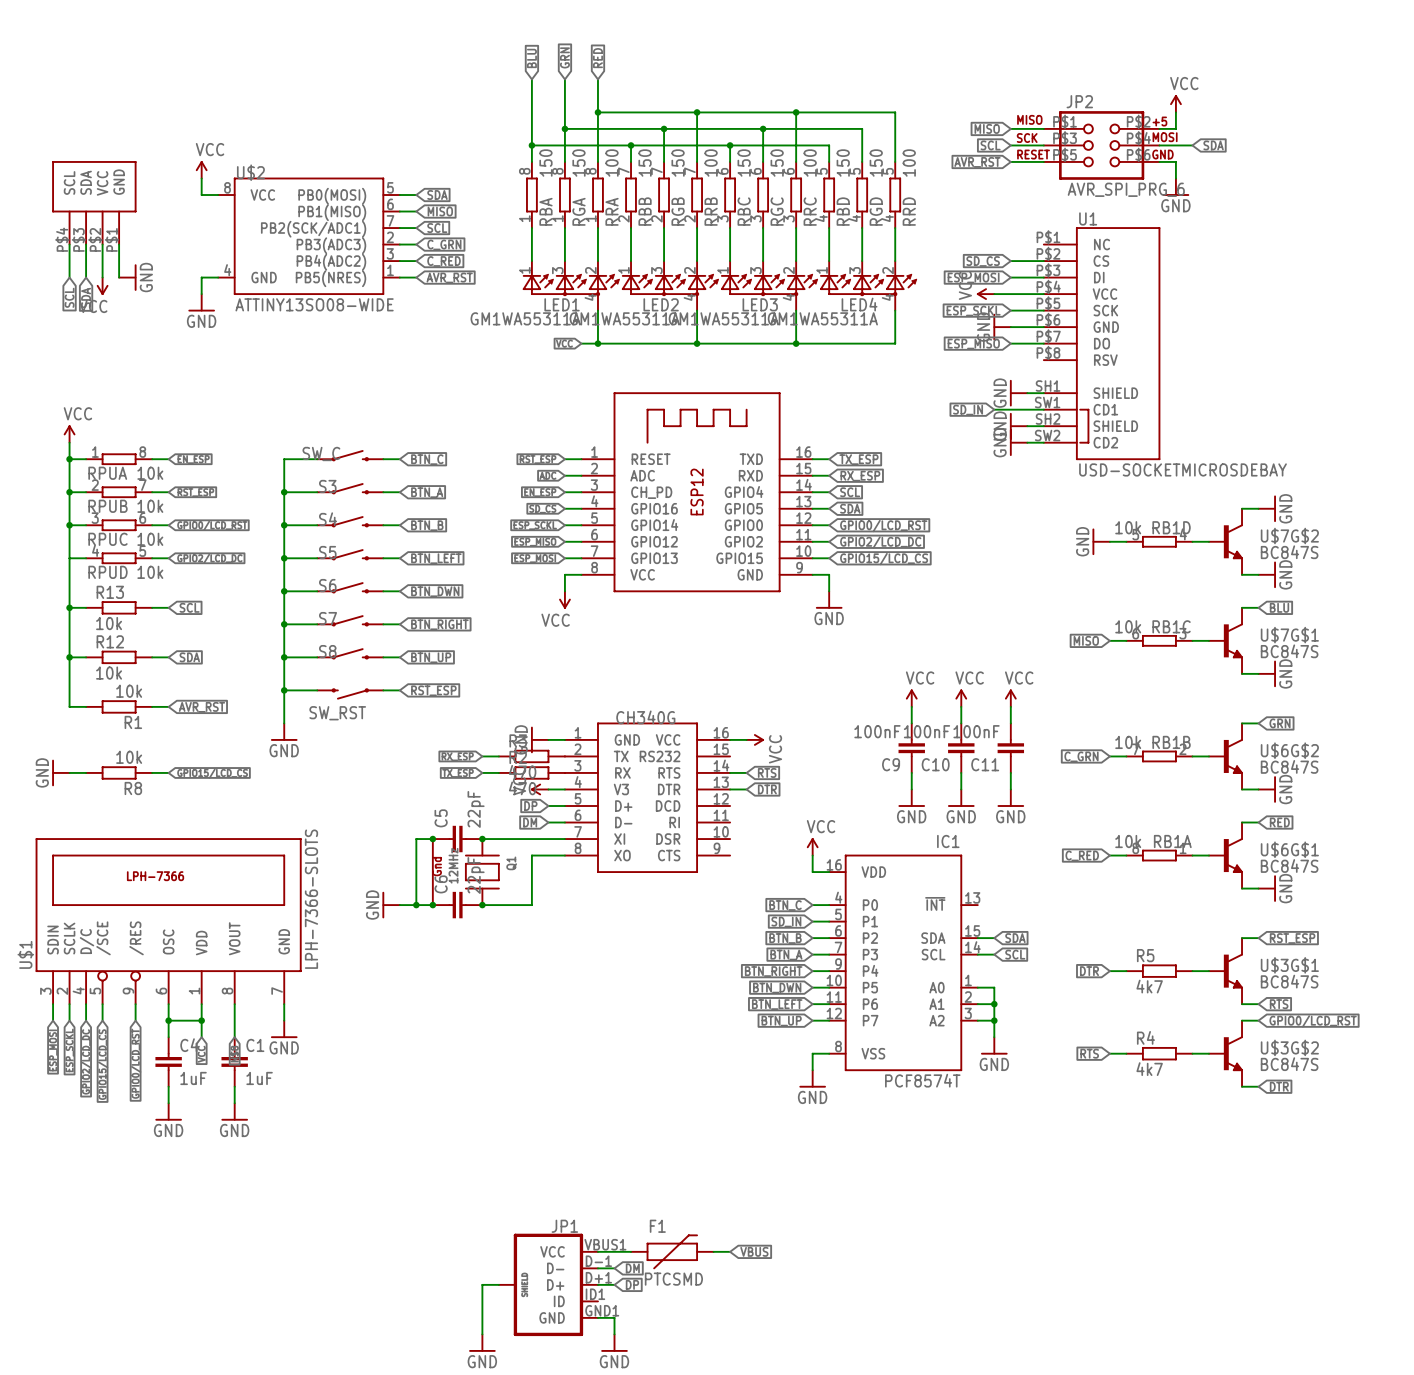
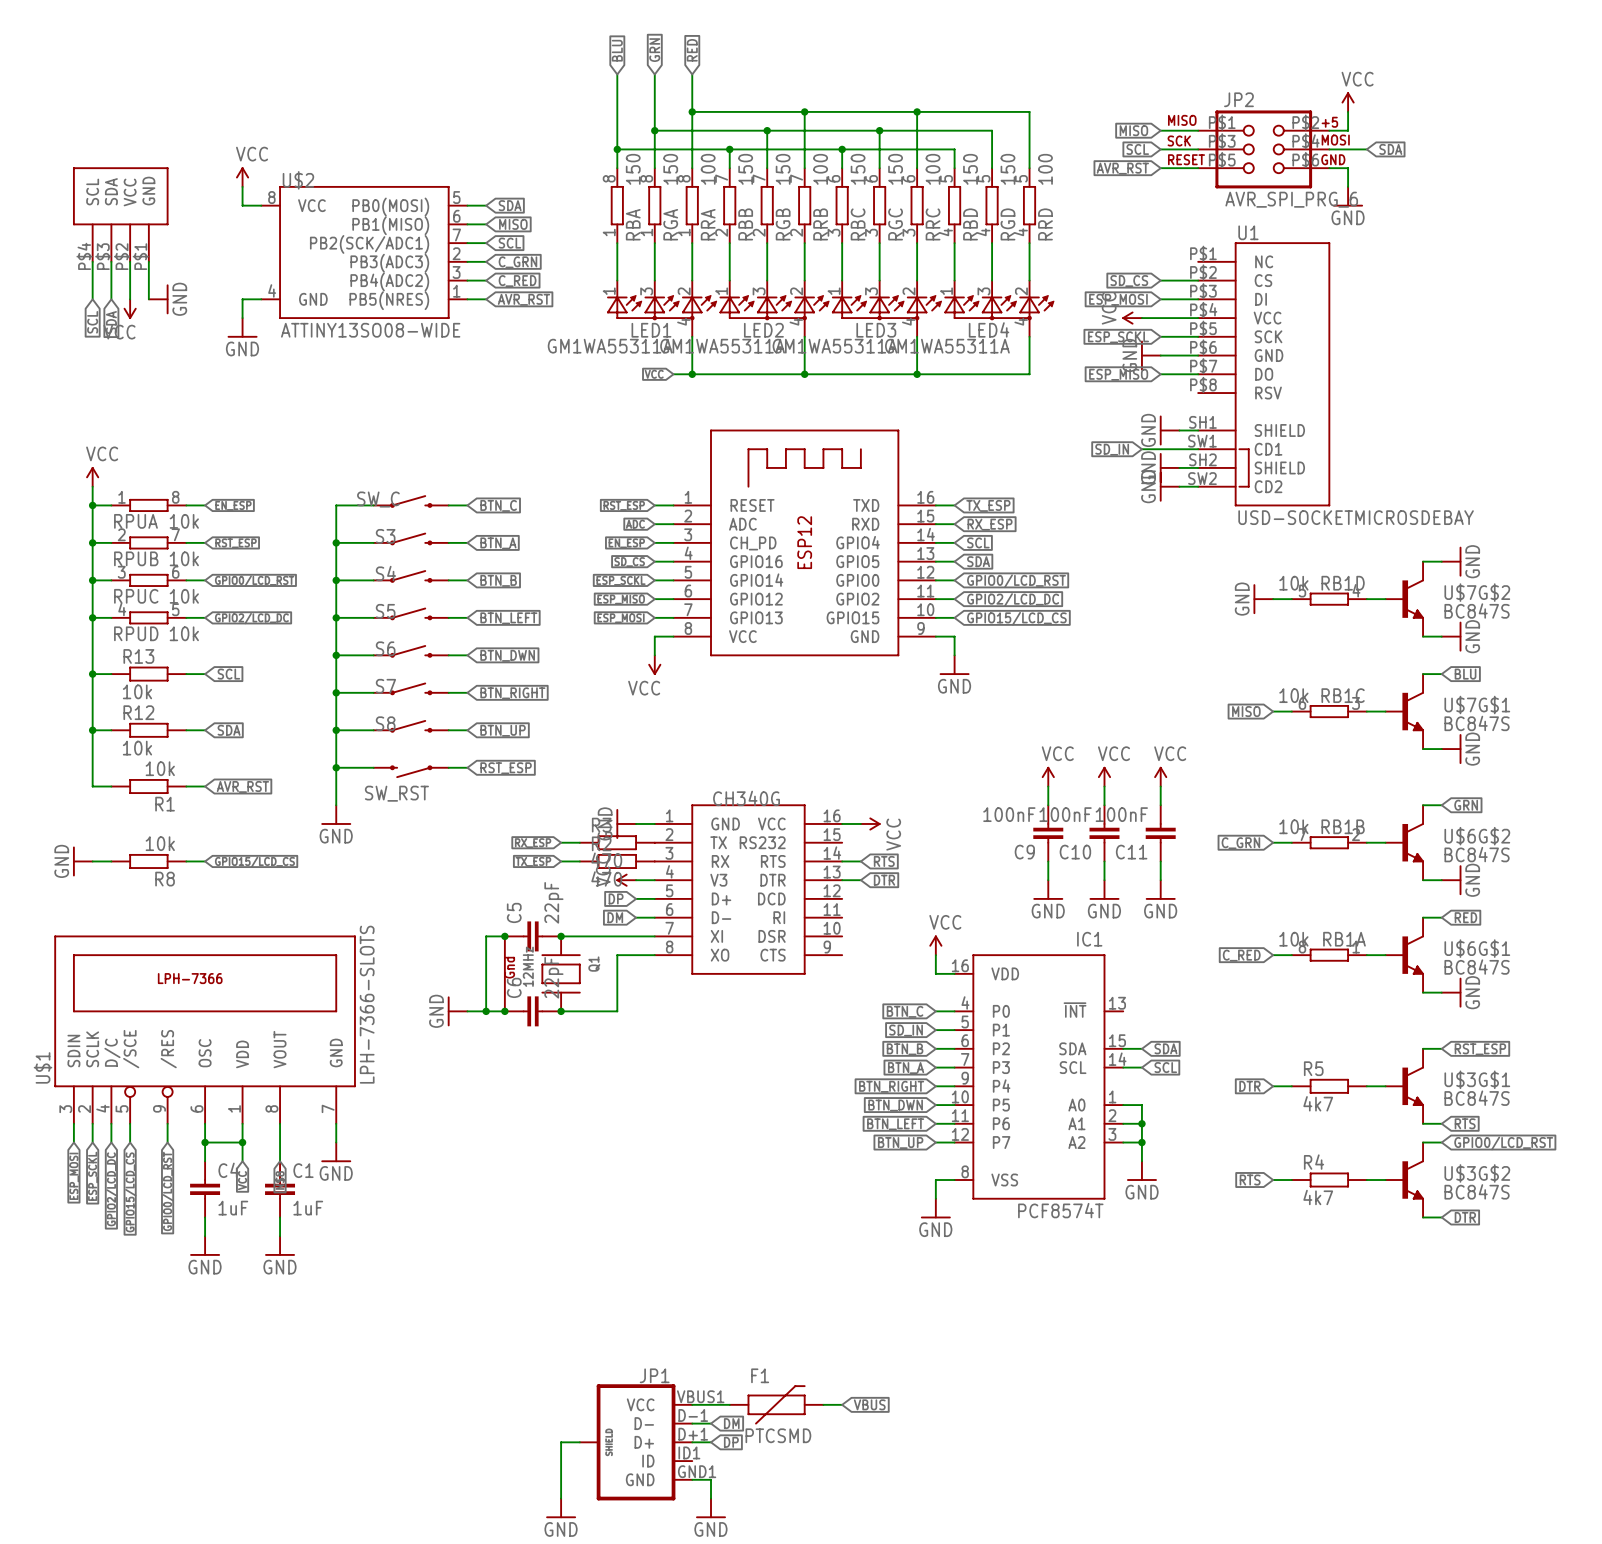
junction: none -> (92, 617)

